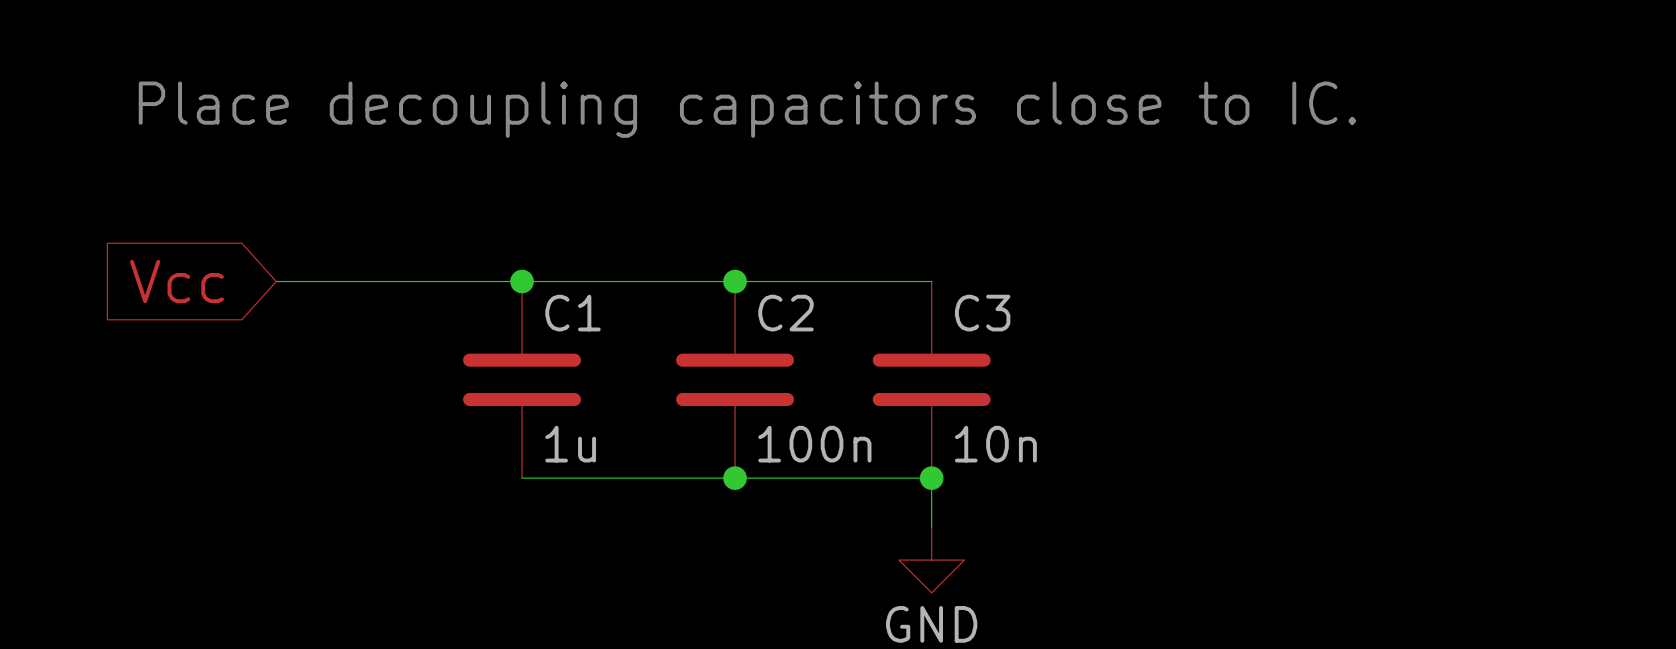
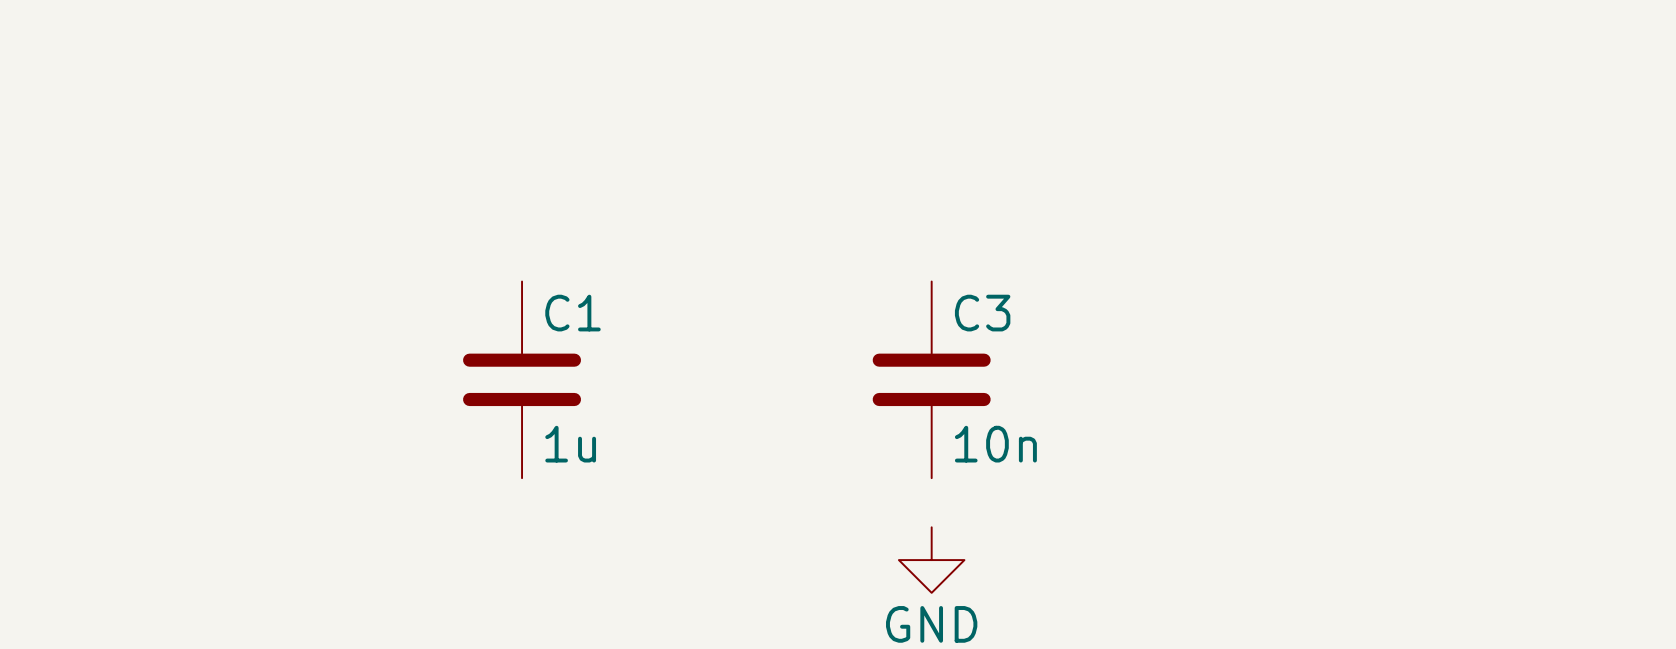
text: Place decoupling capacitors close to IC. (747, 109) -> none
global label: Vcc (176, 281) -> none
wire: (276, 281) (931, 281) -> none
junction: (522, 281) -> none
junction: (735, 281) -> none
C2: 100n (735, 379) -> none
wire: (522, 478) (931, 478) (931, 527) -> none
junction: (735, 478) -> none
junction: (931, 478) -> none

